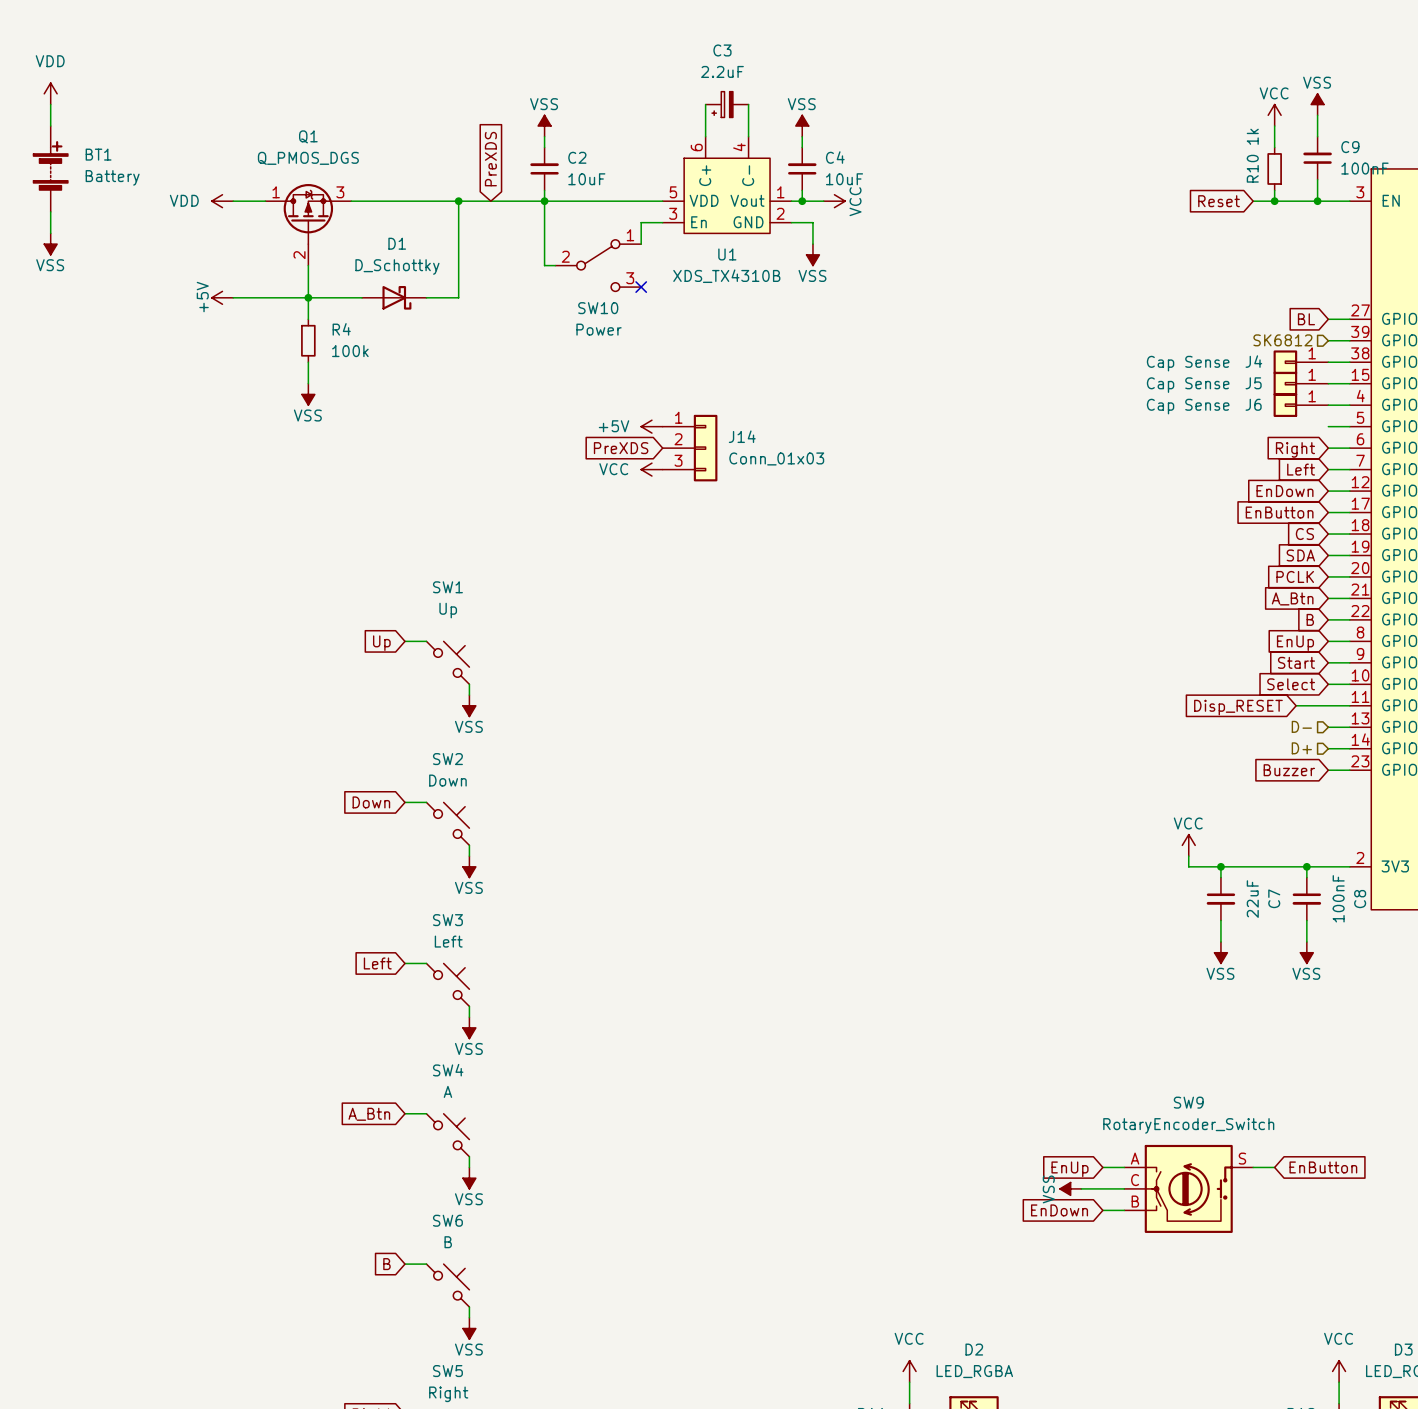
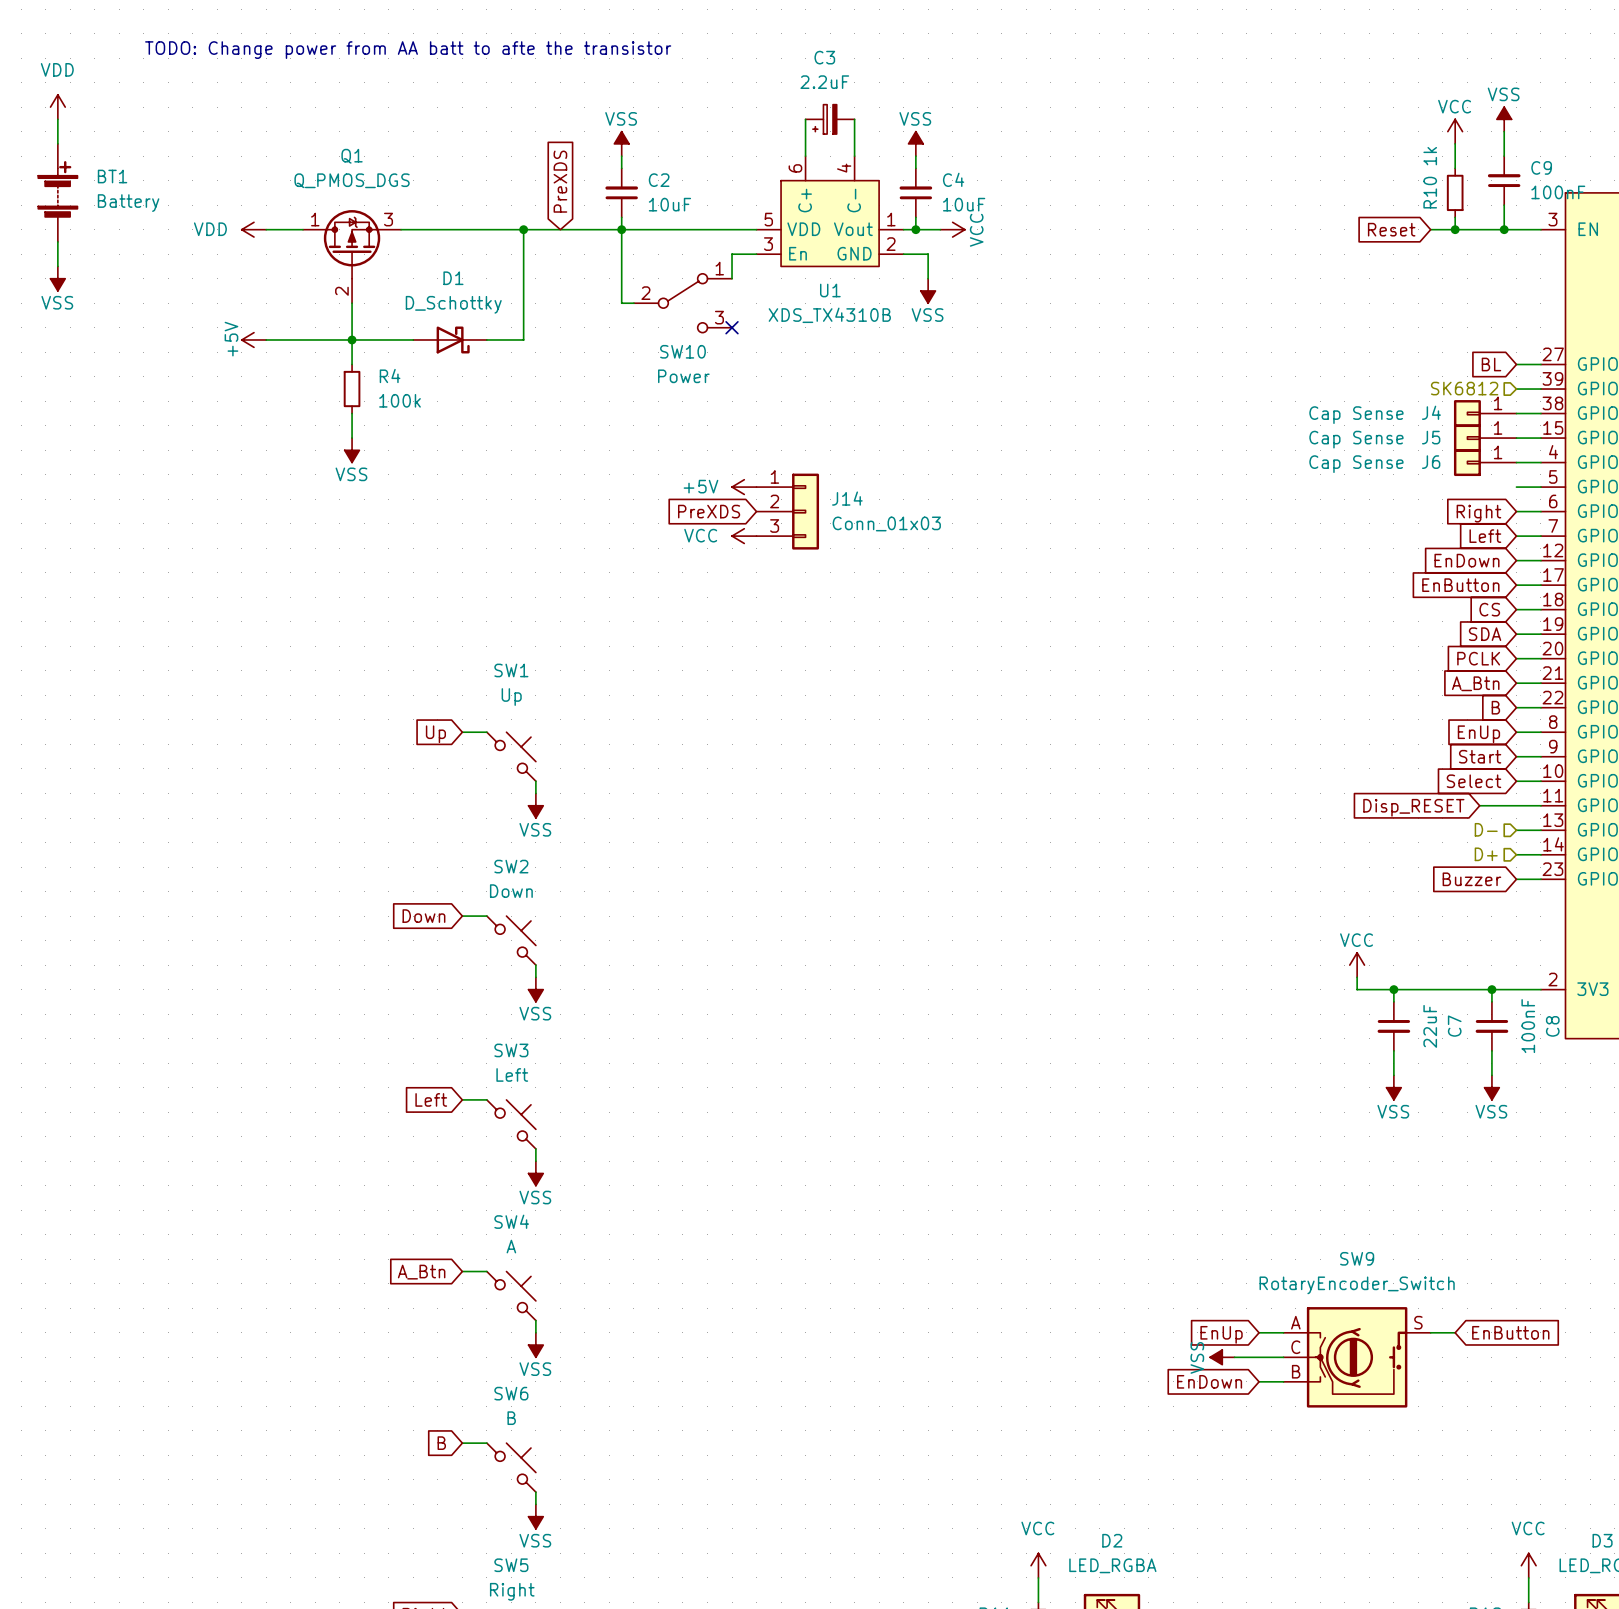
text: none -> TODO: Change power from AA batt to afte the transistor (408, 50)
SW9 symbol: [1124, 1144, 1254, 1233] -> [1283, 1307, 1431, 1408]

